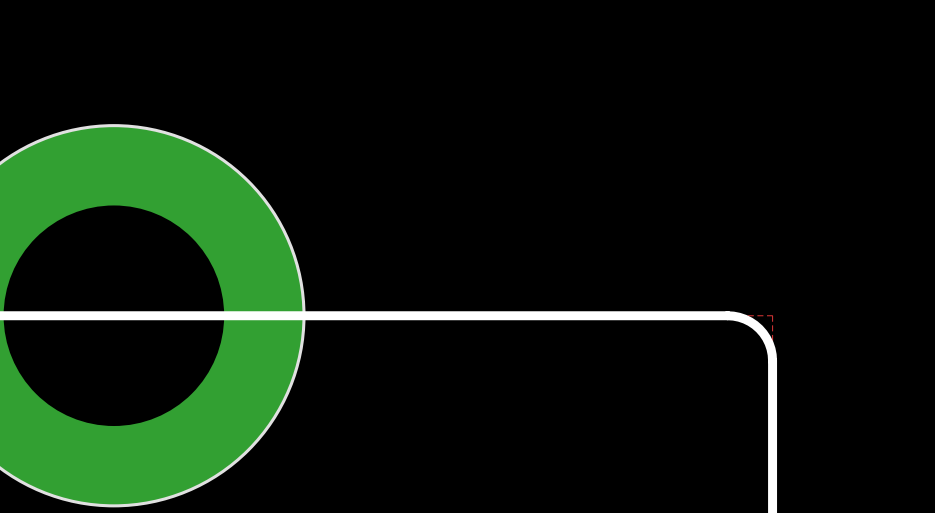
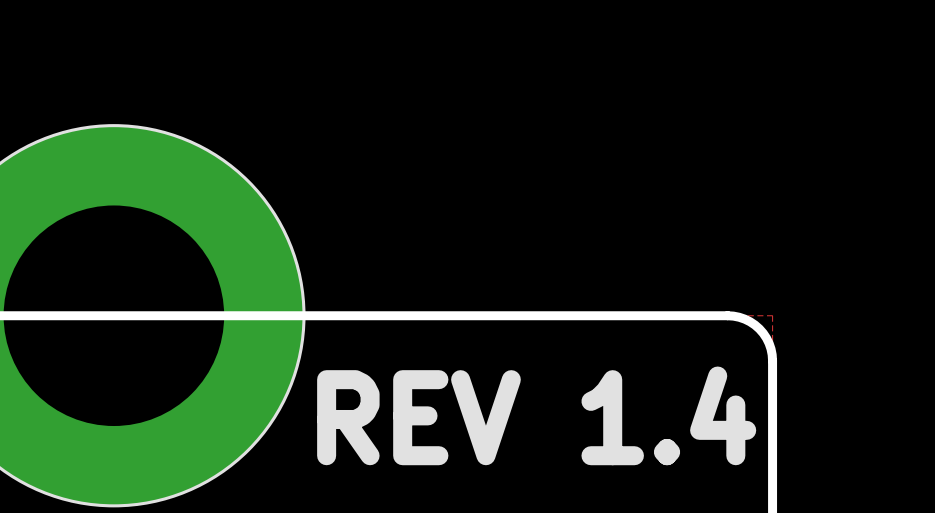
text: none -> REV 1.4 (536, 415)

